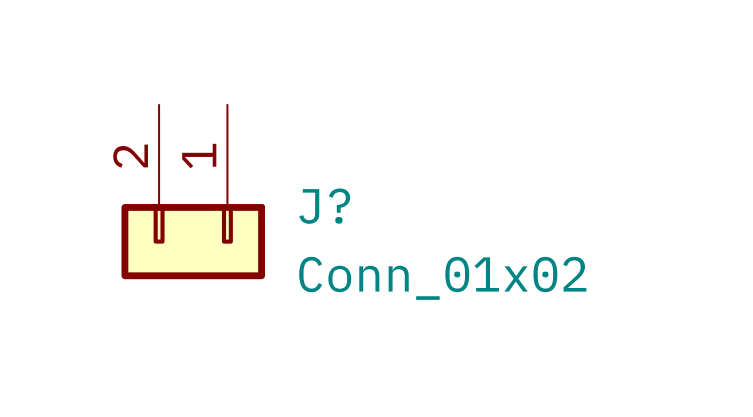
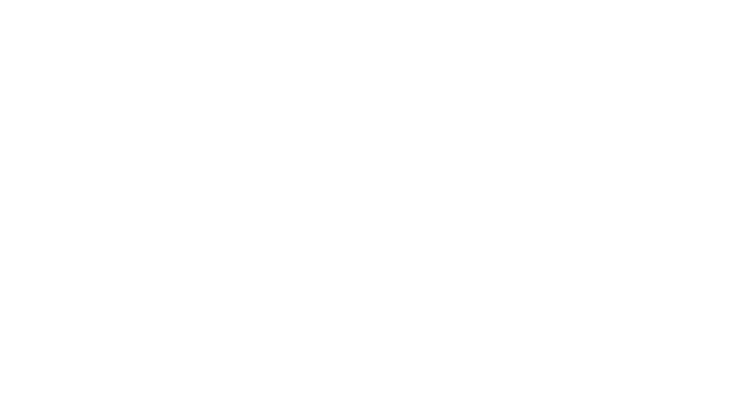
J?: Conn_01x02 (193, 192) -> none

